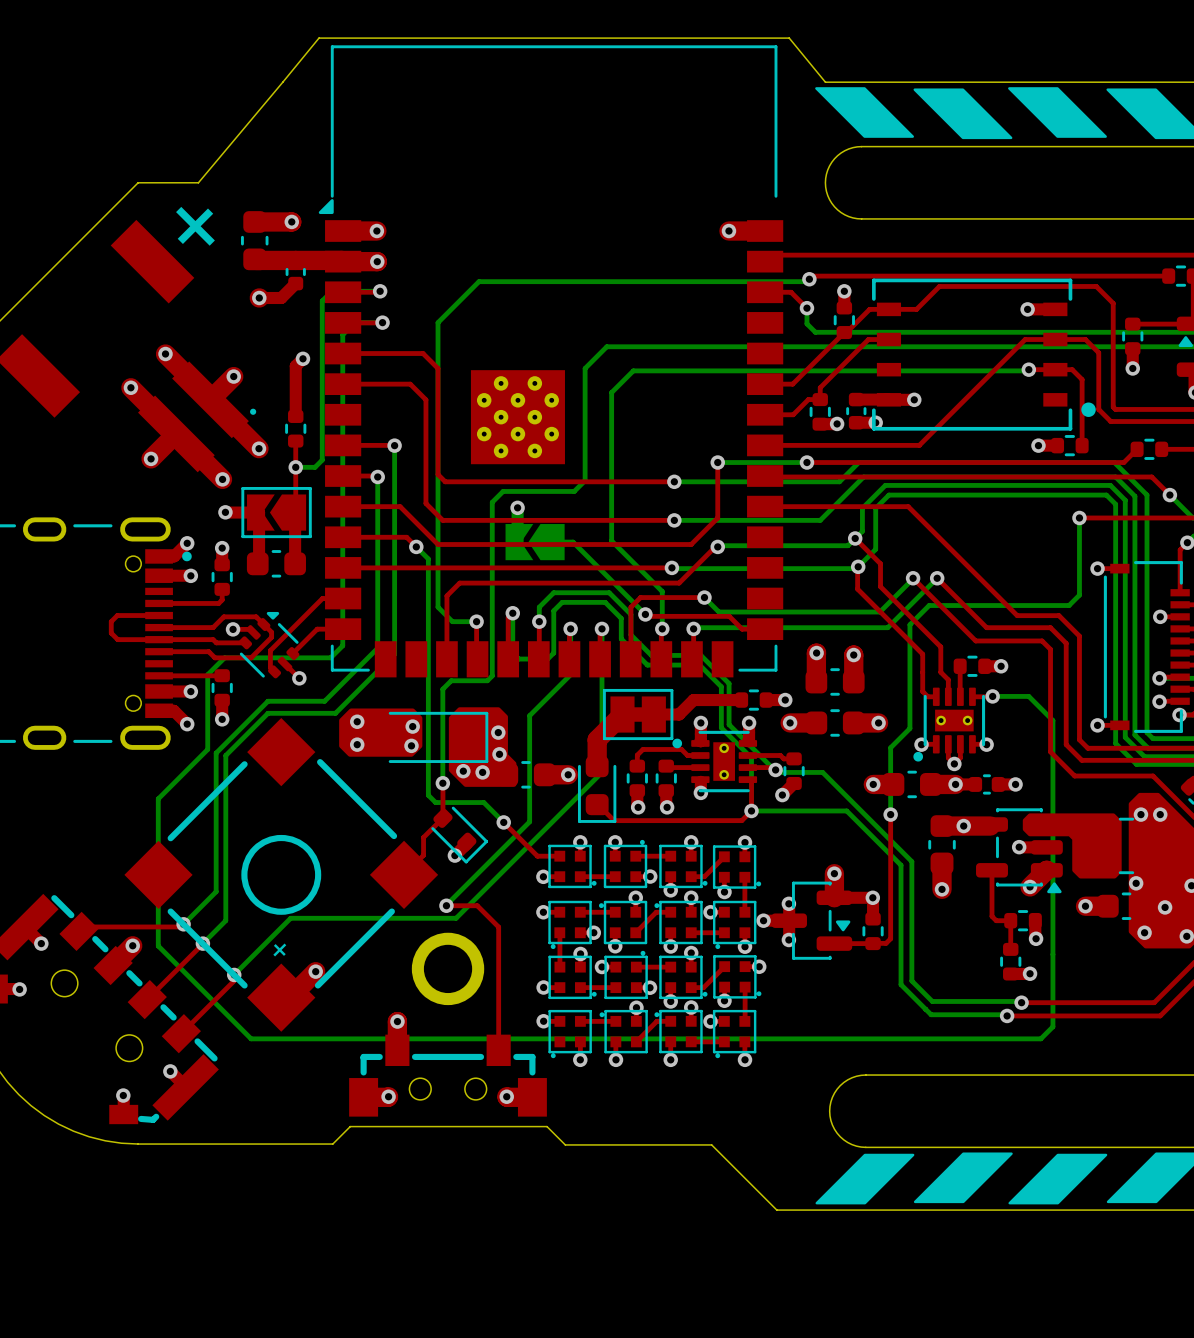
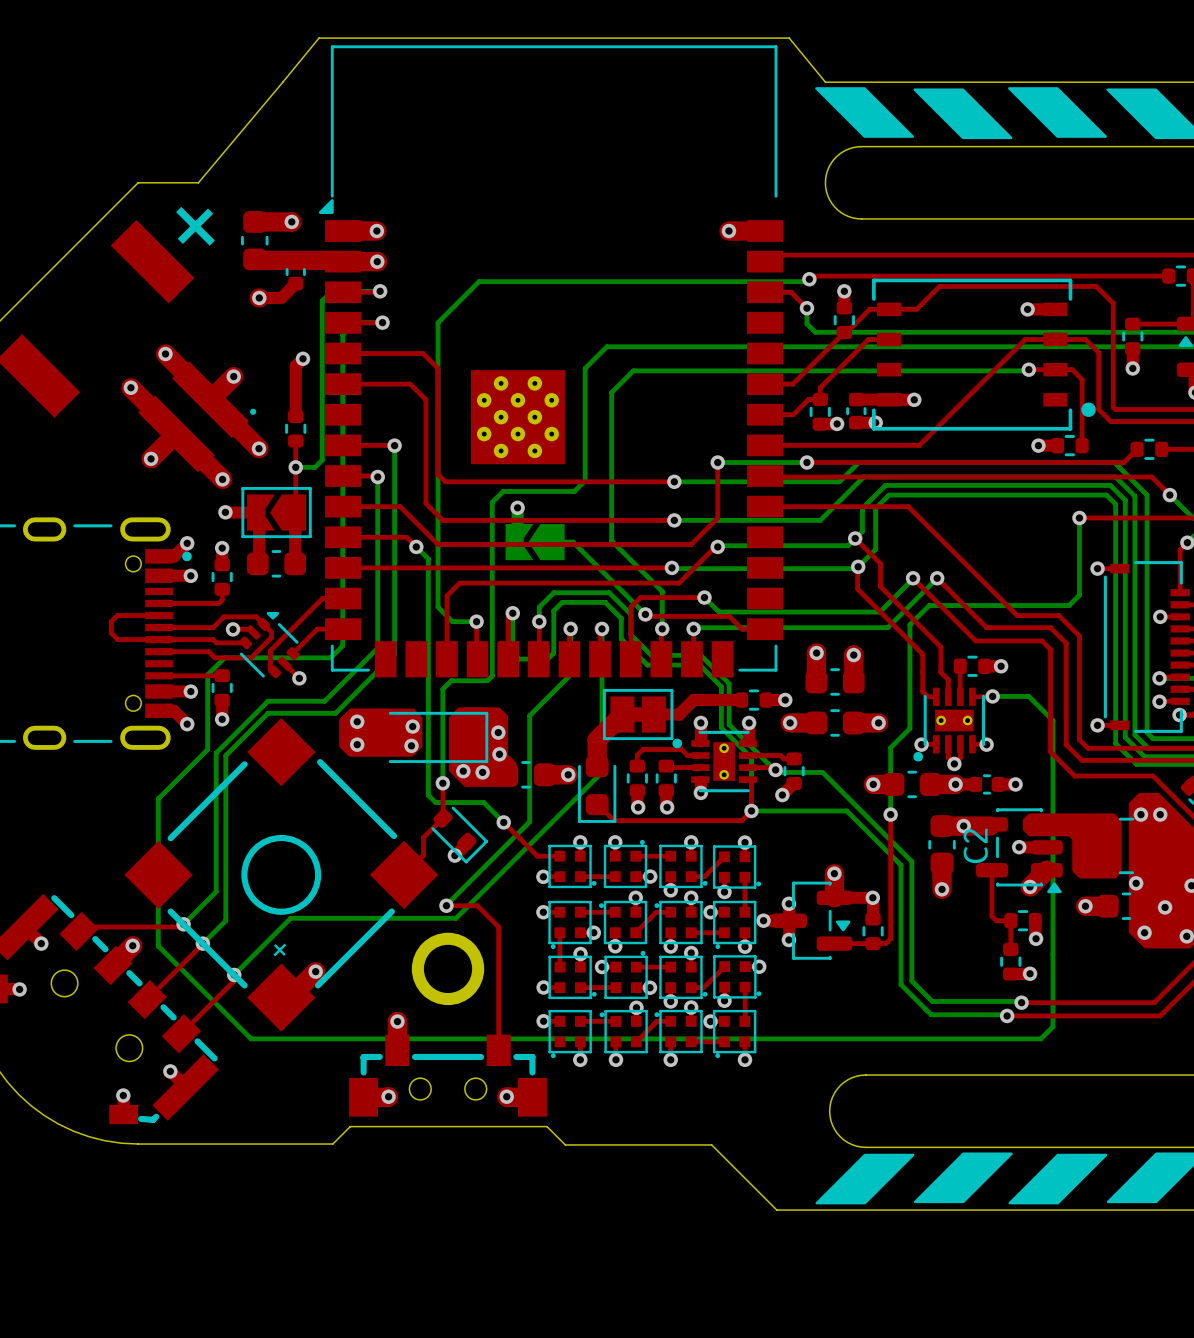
C2 name: none -> C2 (975, 845)

